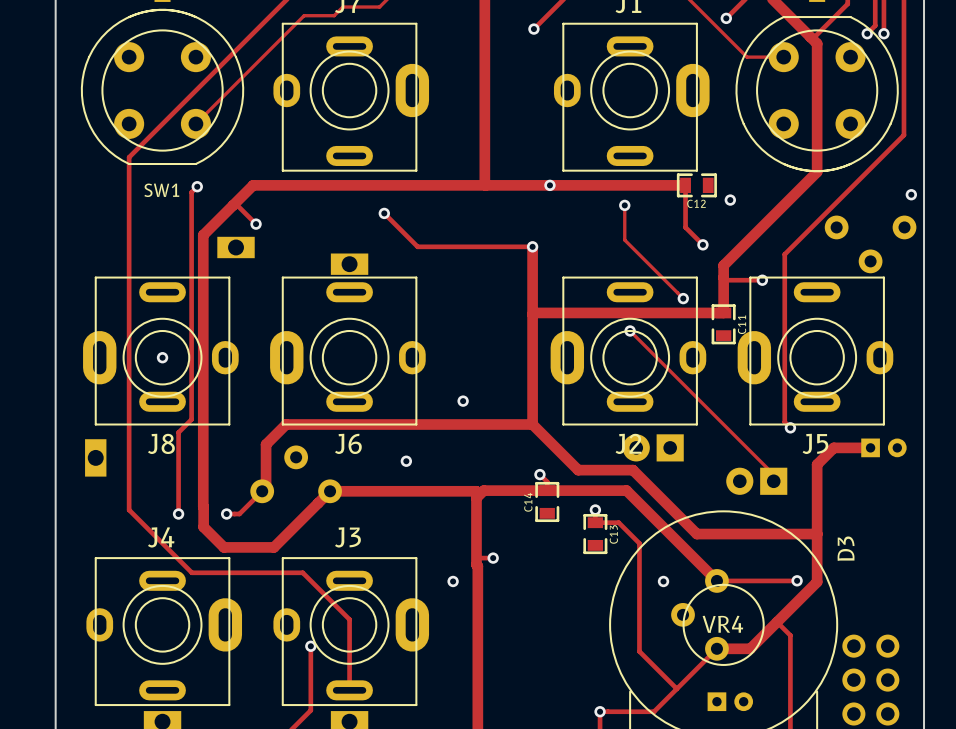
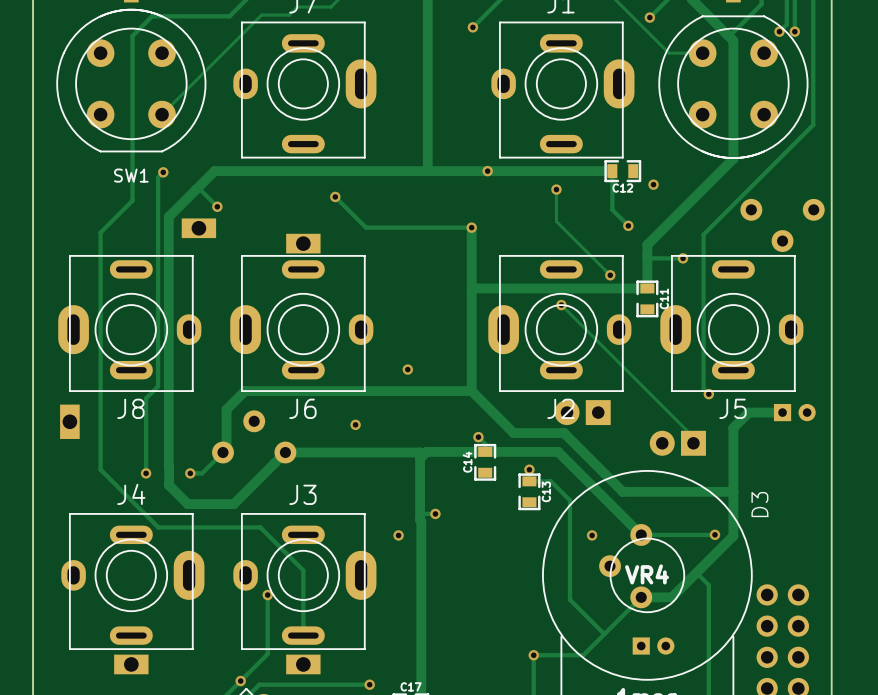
track: (269, 17) (129, 157) (129, 252) -> (229, 16) (152, 16) (132, 35) (132, 200) (100, 232)
via: (911, 194) -> none
via: (162, 357) -> none

